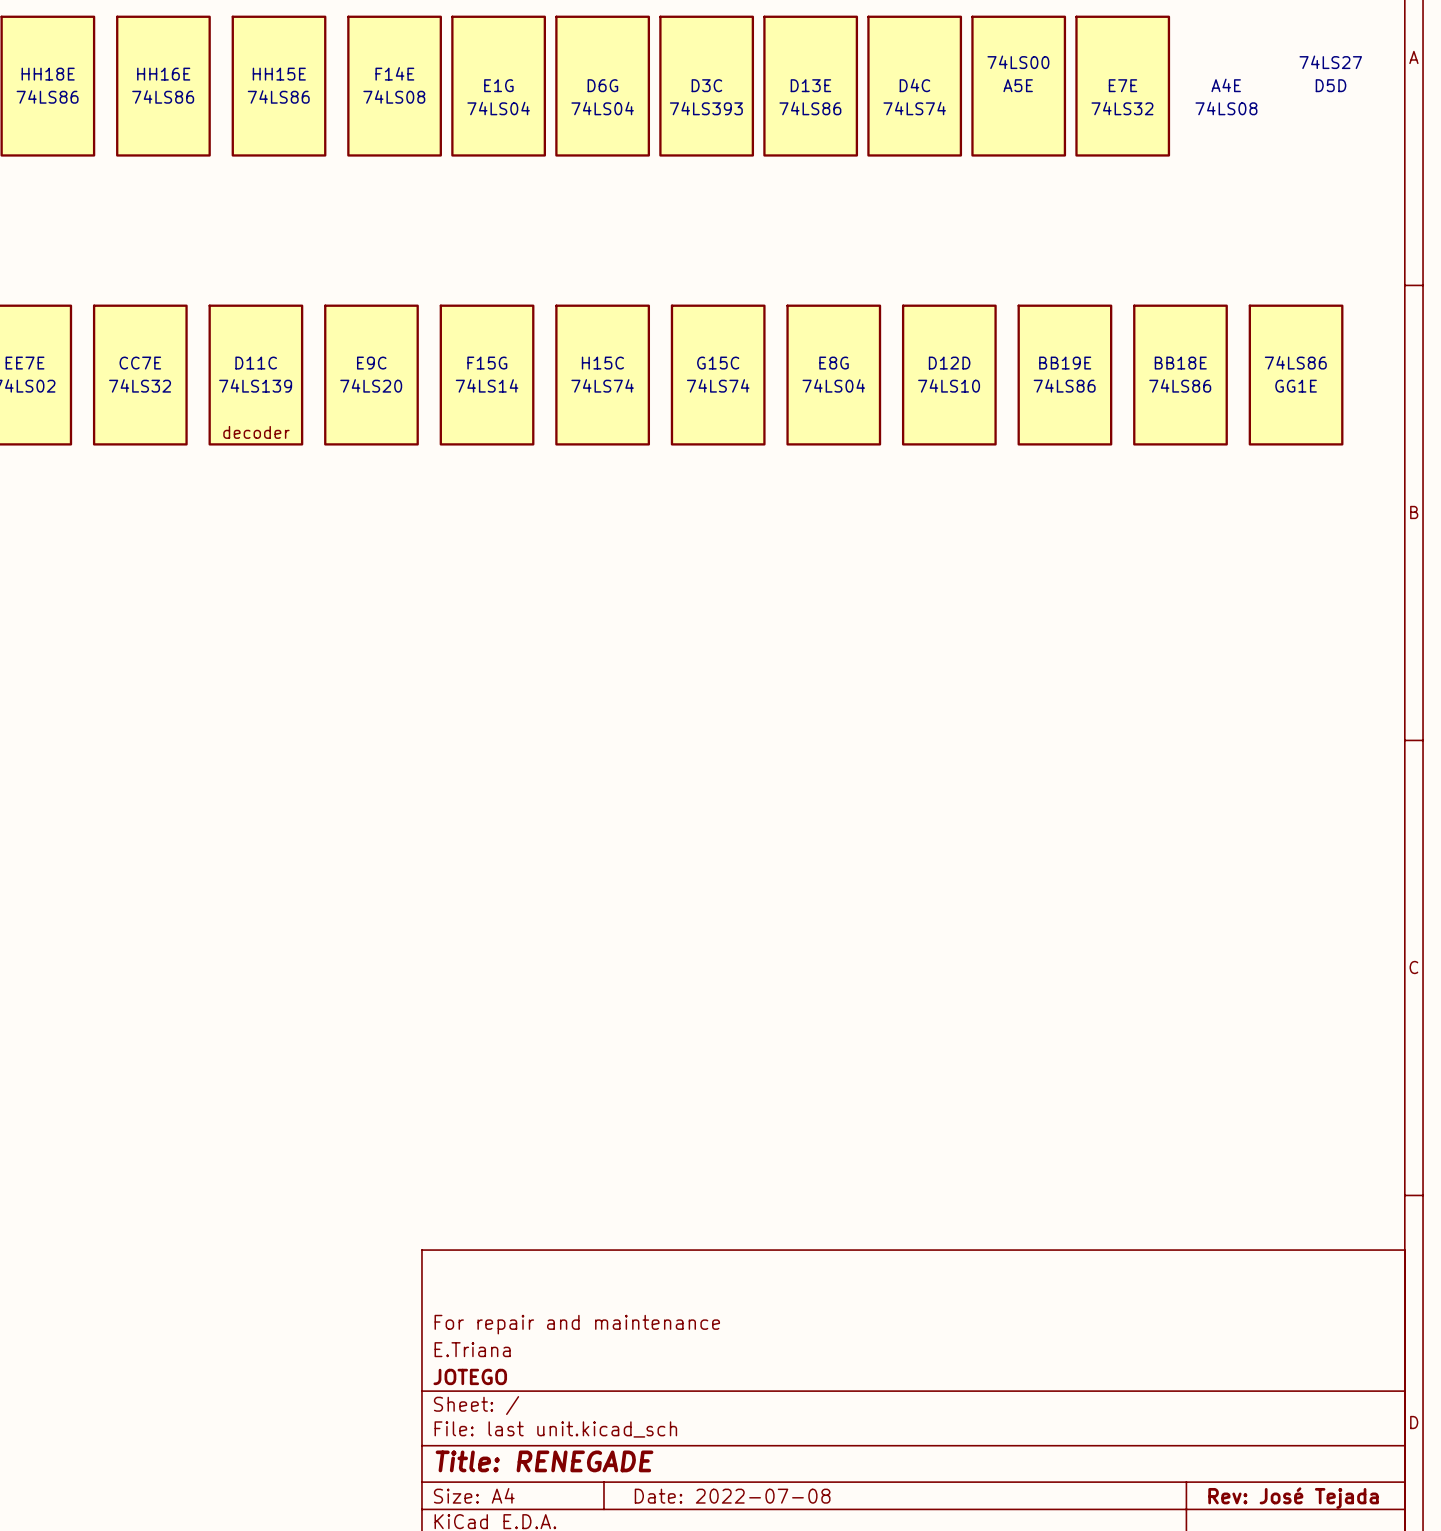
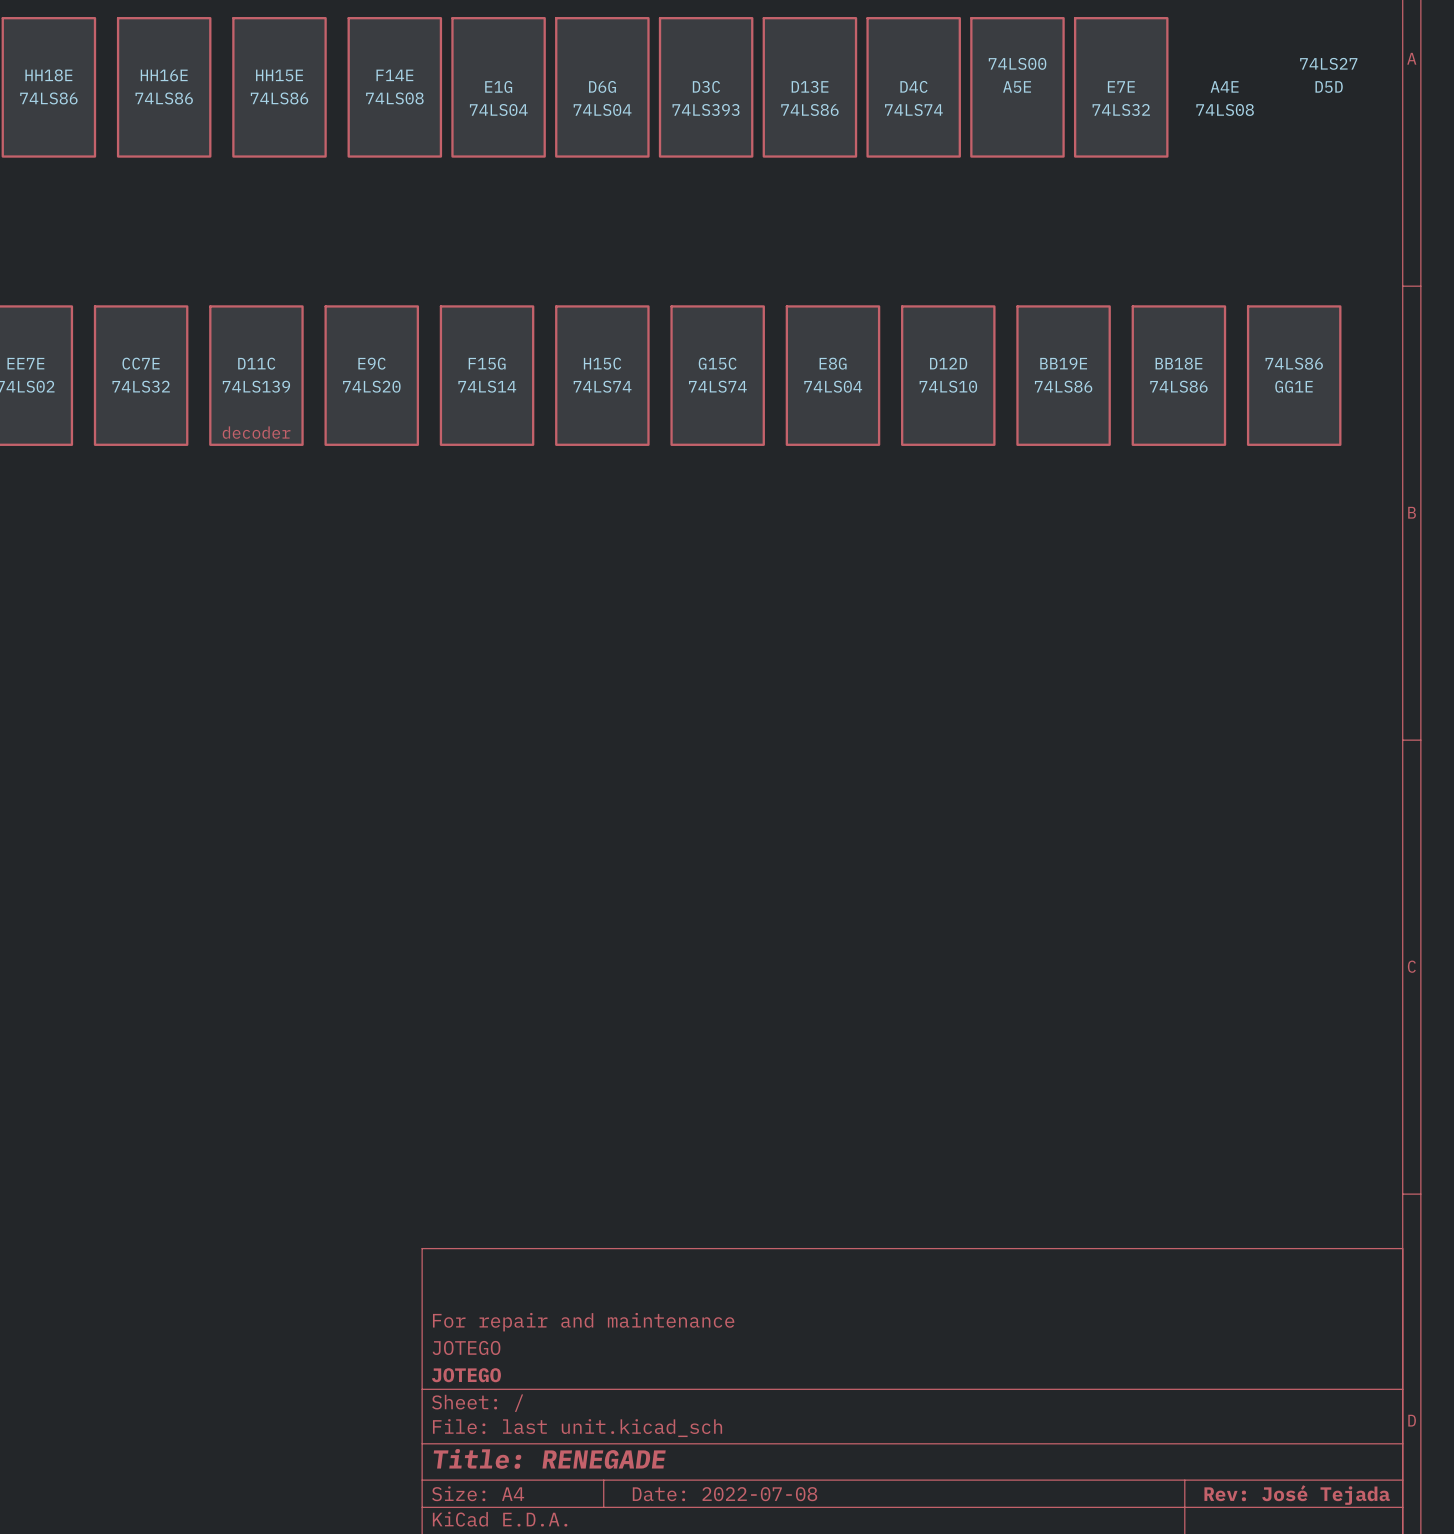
title block: E.Triana (472, 1349) -> JOTEGO (466, 1347)

